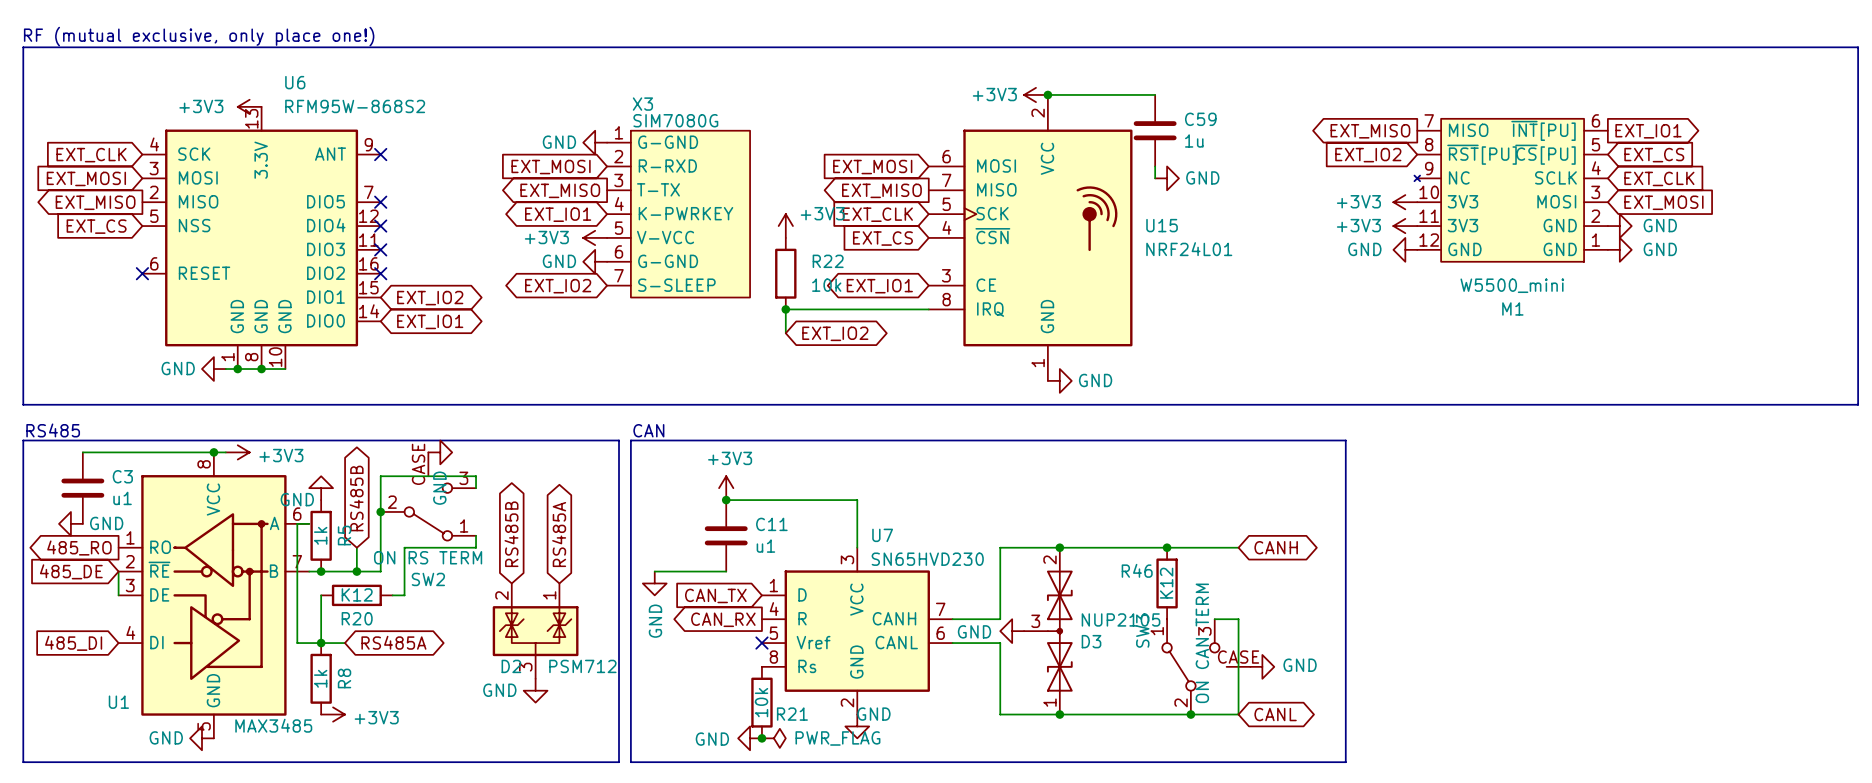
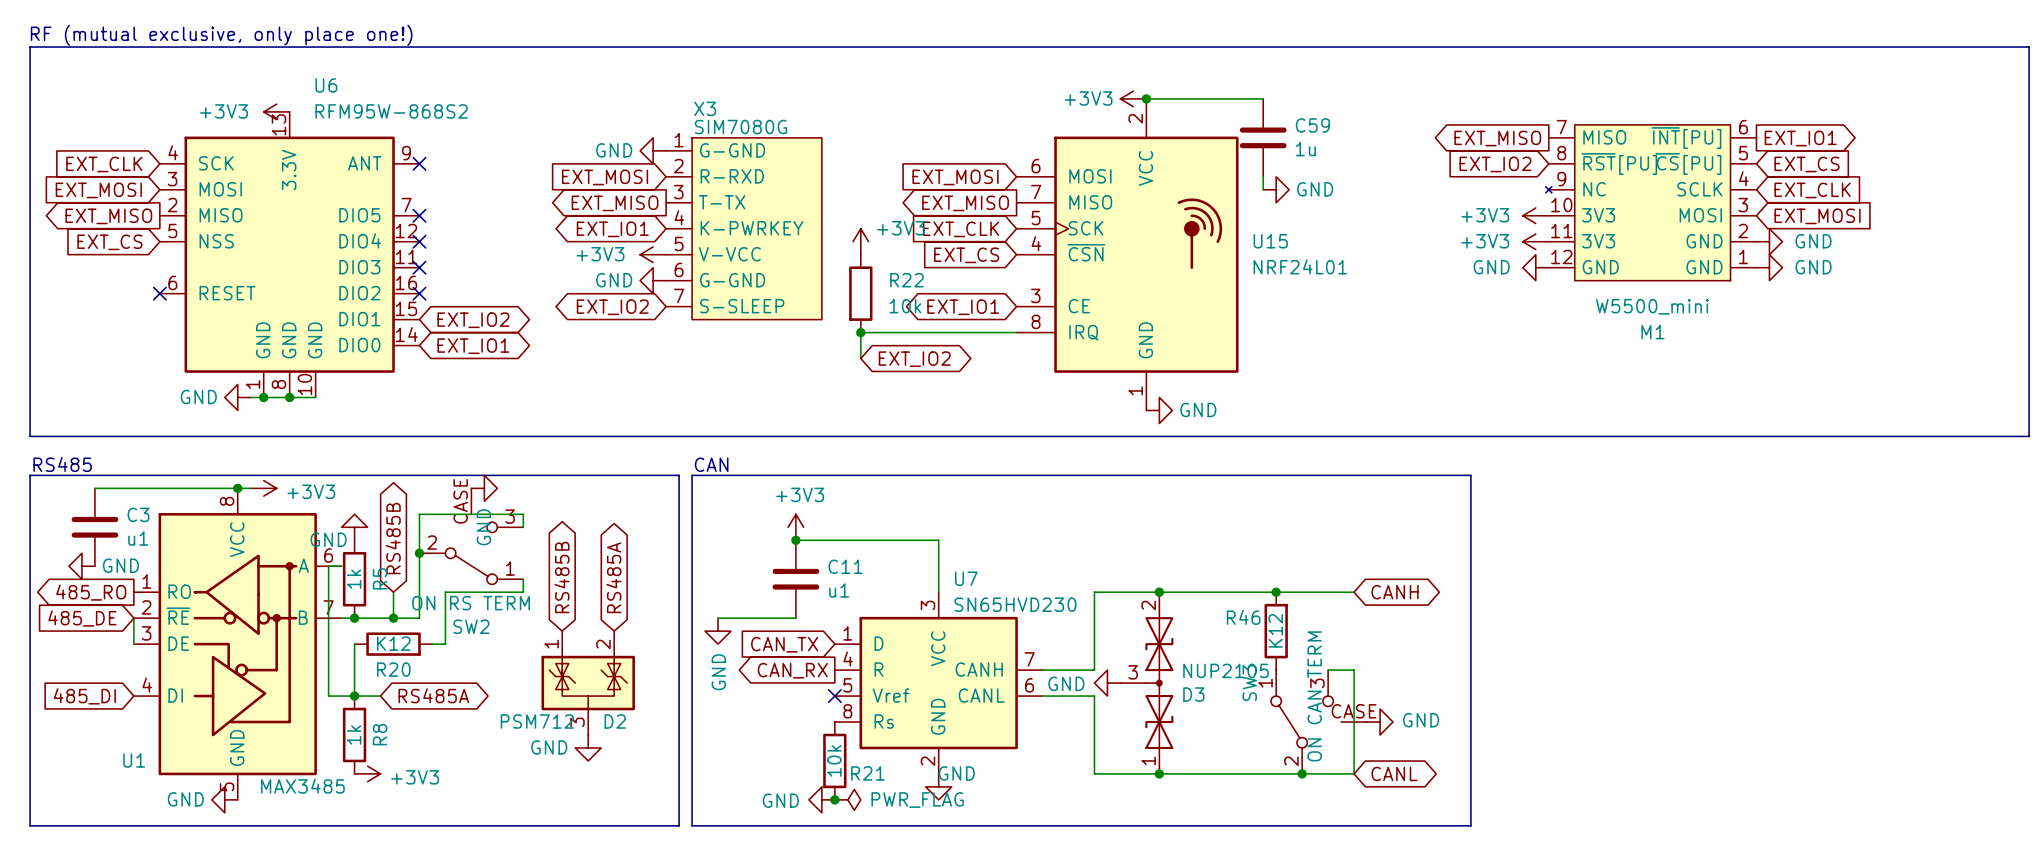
D2 flip: as is (535, 631) -> left-right (588, 683)

